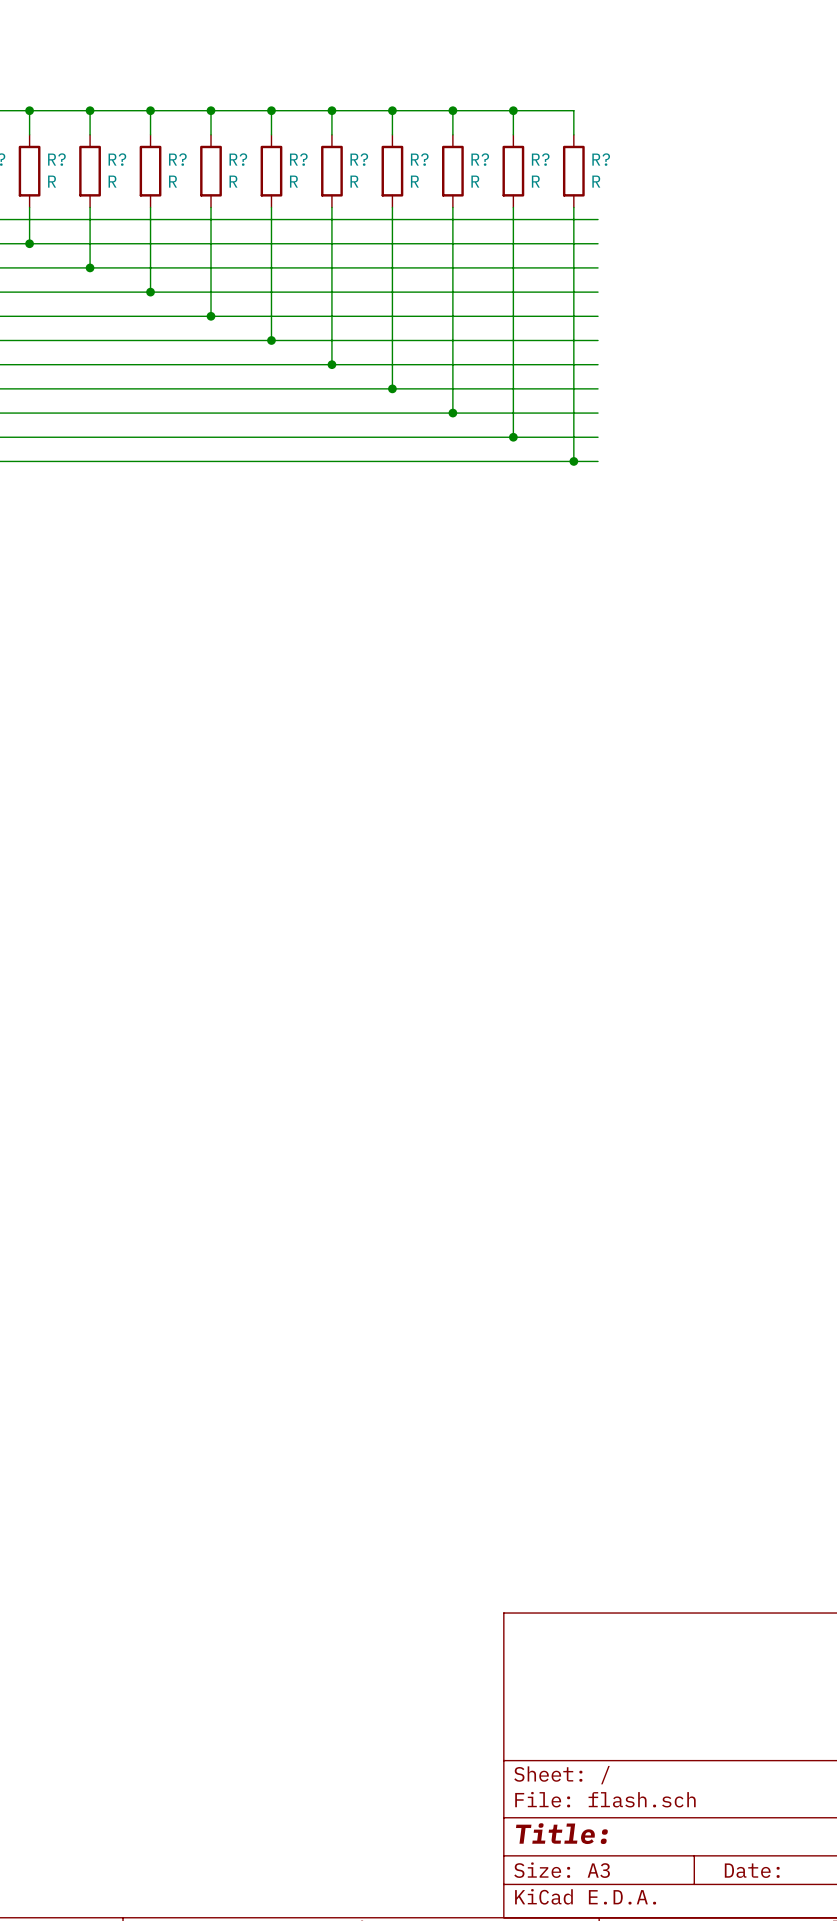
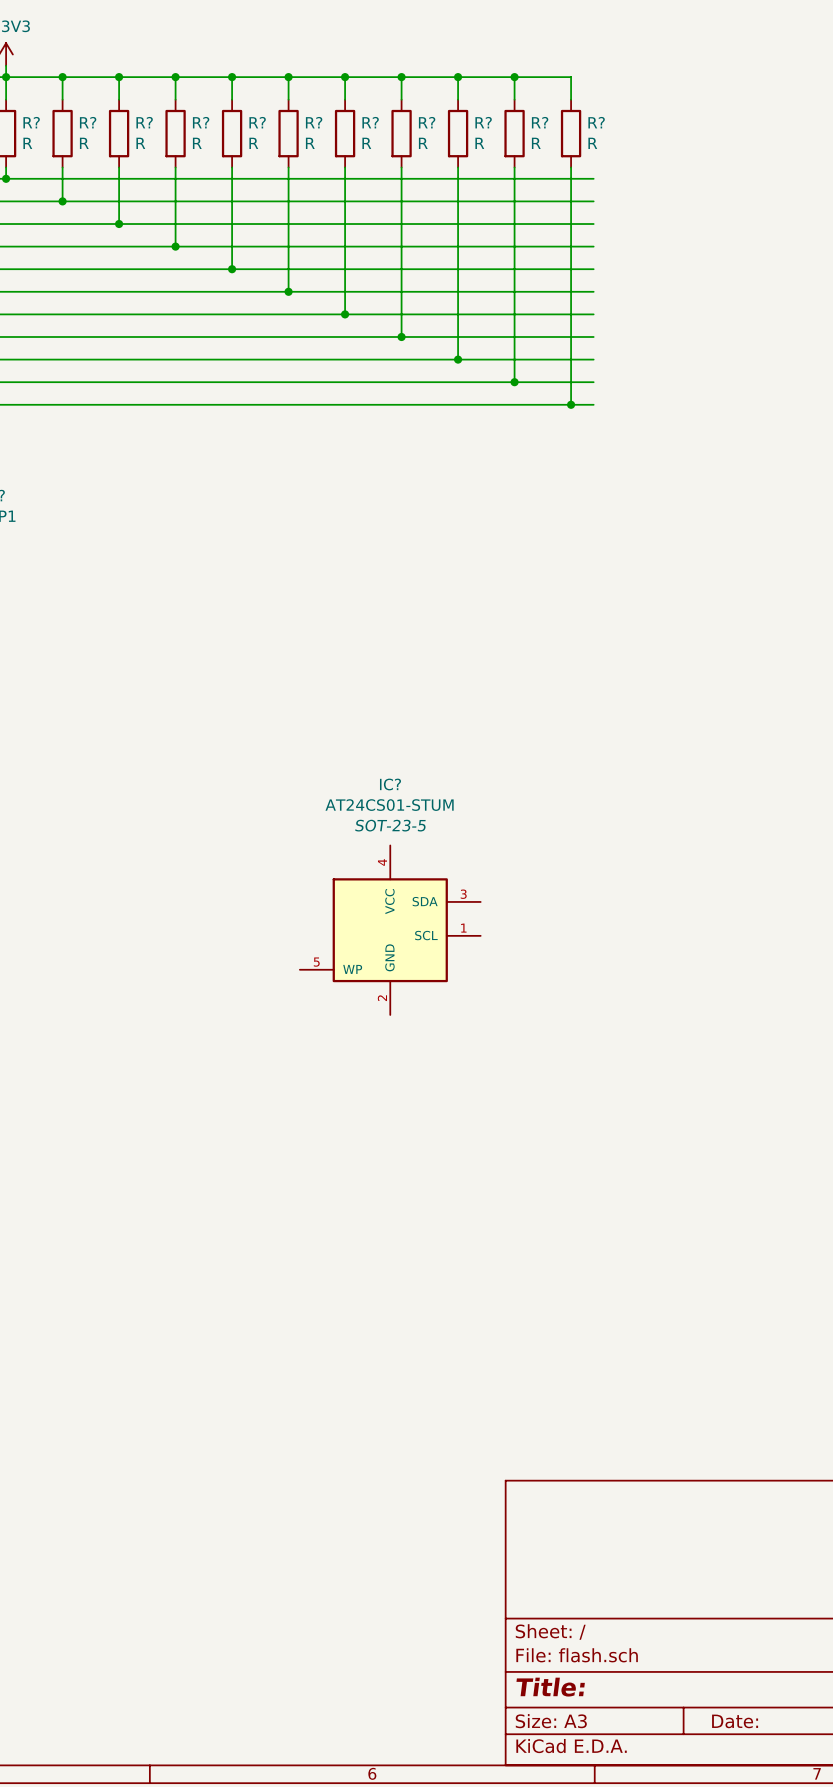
IC?: none -> AT24CS01-STUM (390, 930)

